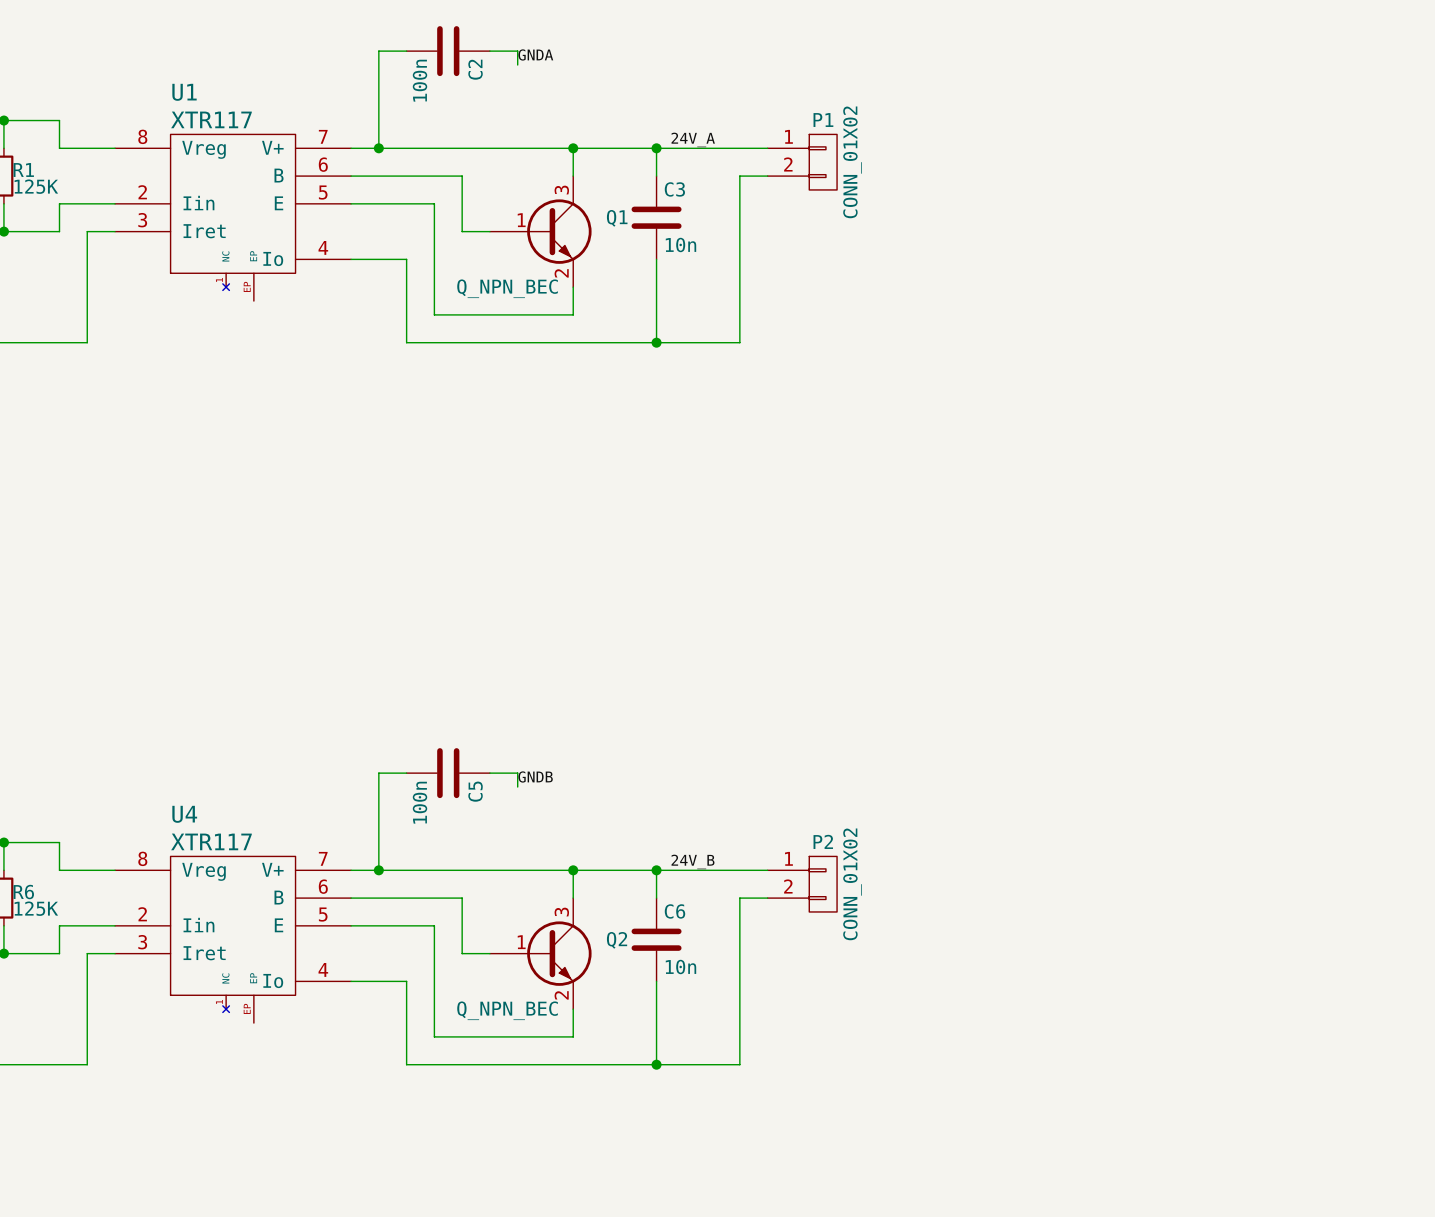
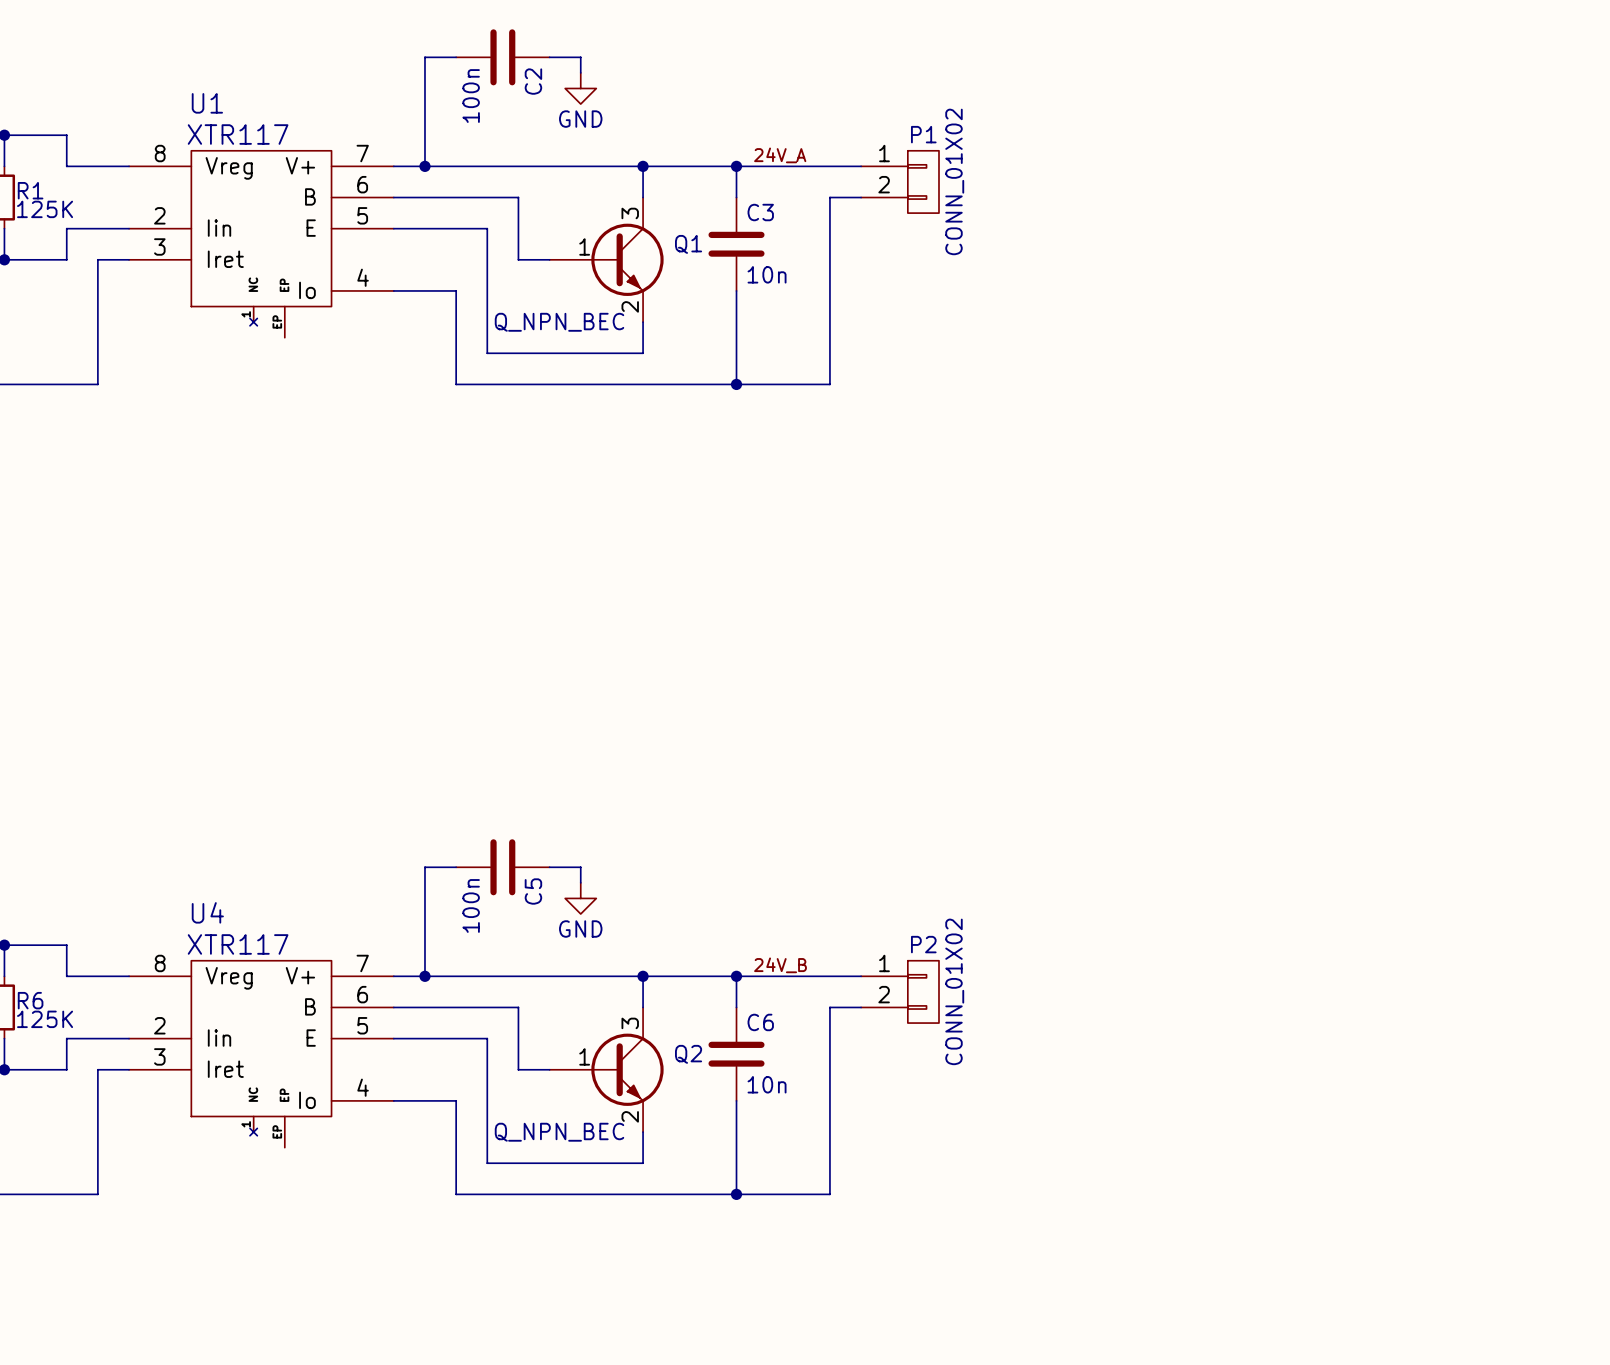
label: GNDA (535, 54) -> none
power symbol: none -> GND (580, 88)
label: GNDB (535, 776) -> none
power symbol: none -> GND (580, 898)

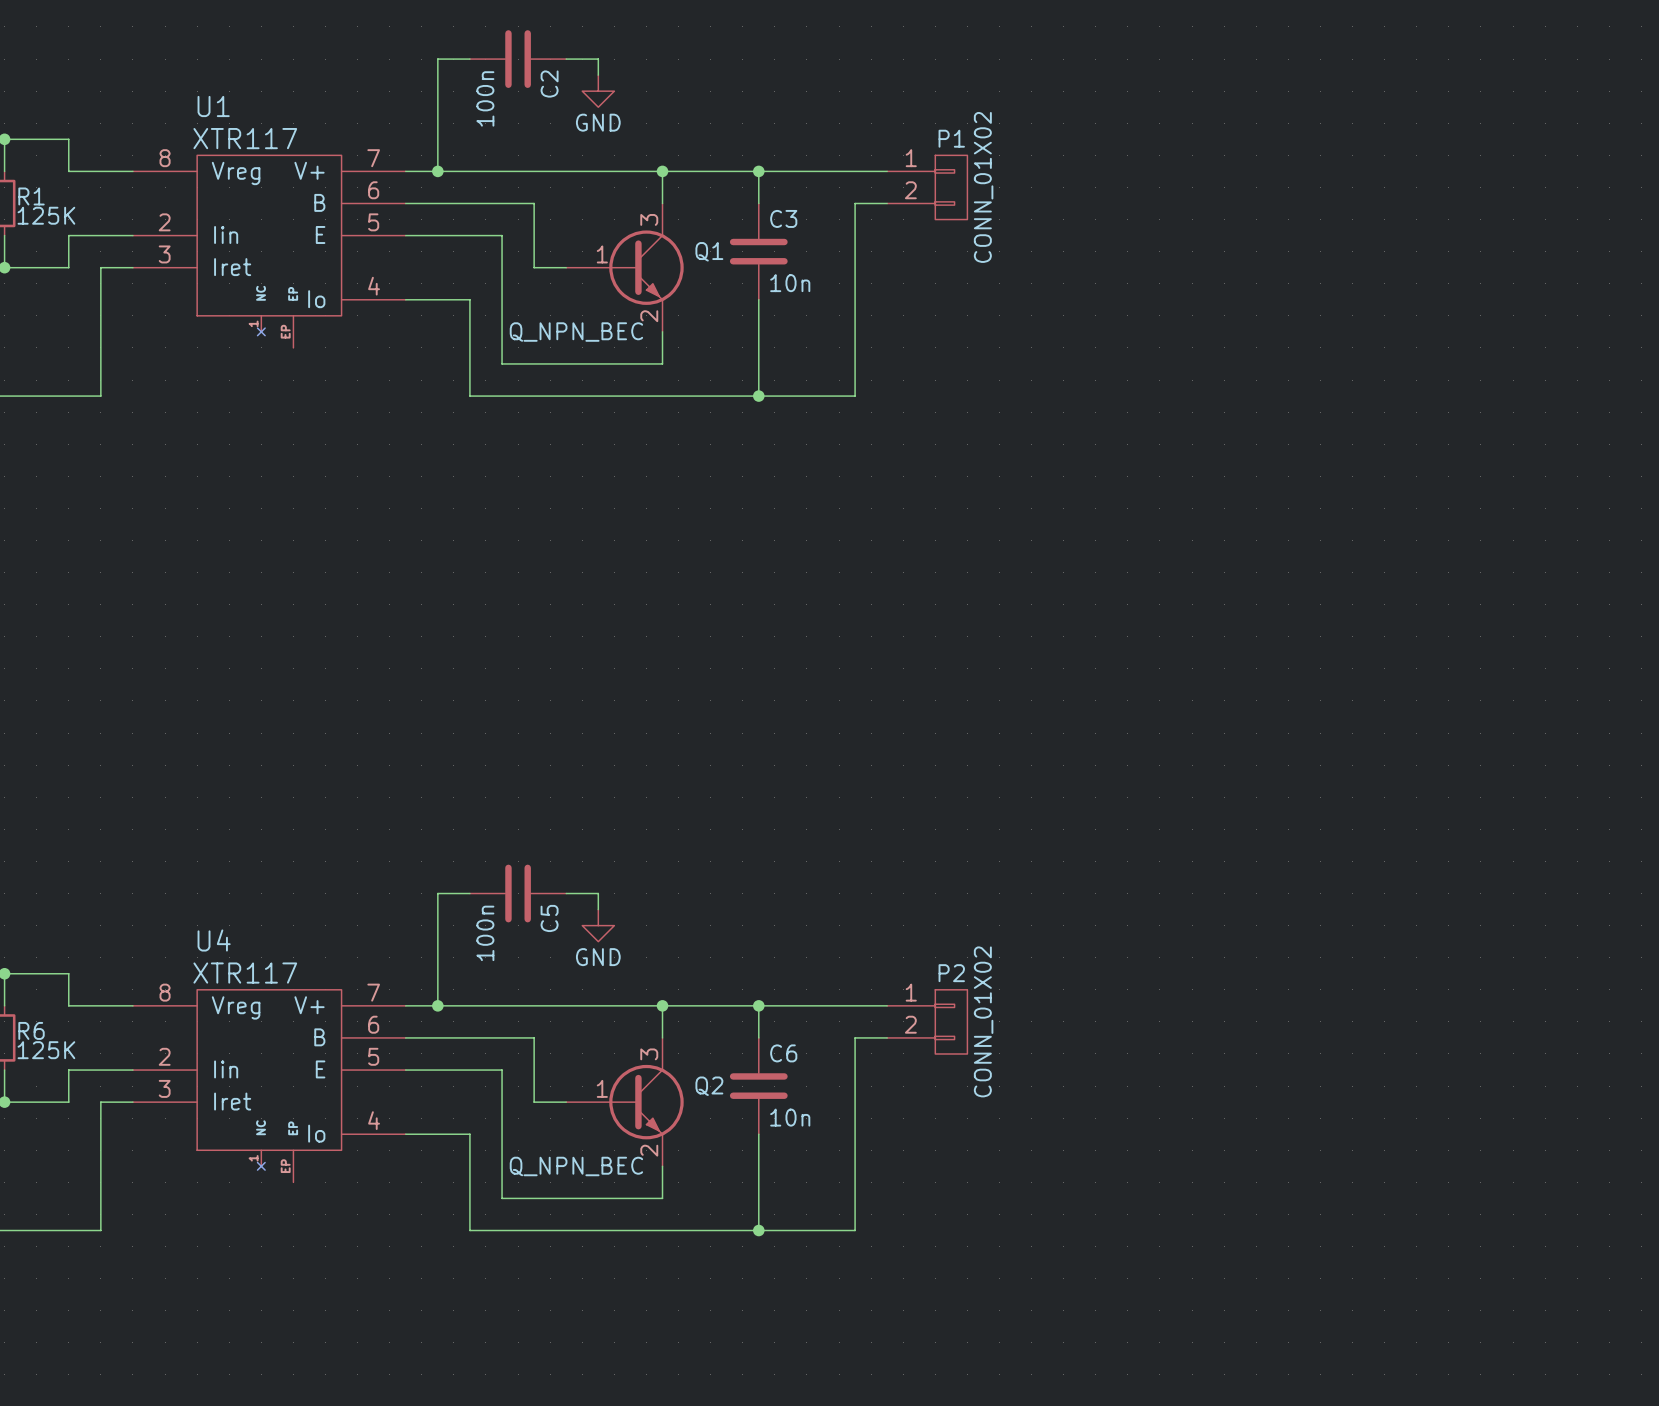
label: 24V_A (780, 155) -> none
label: 24V_B (780, 965) -> none

